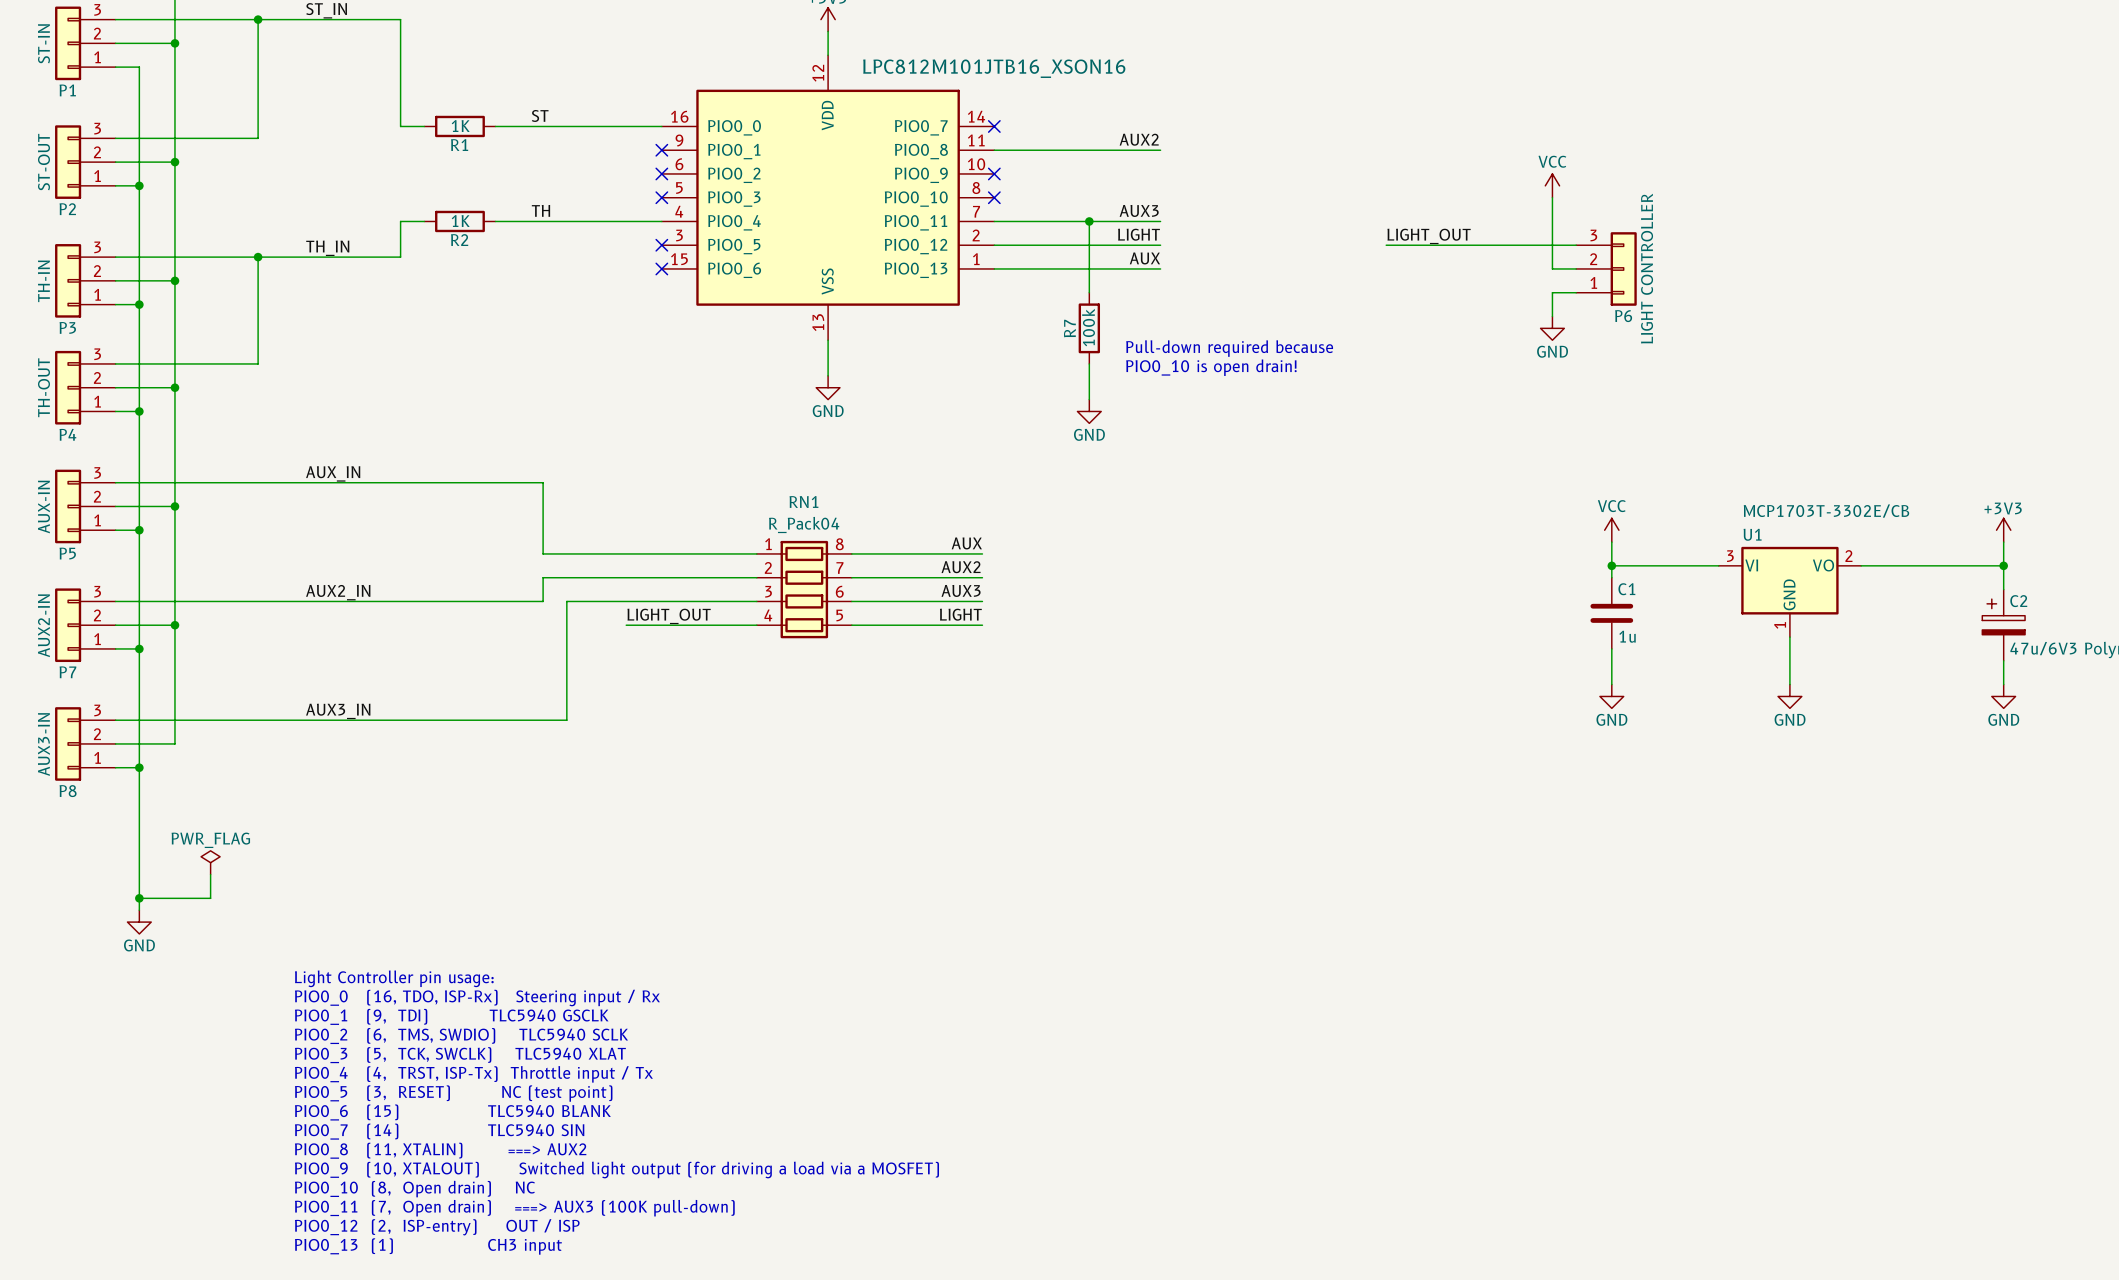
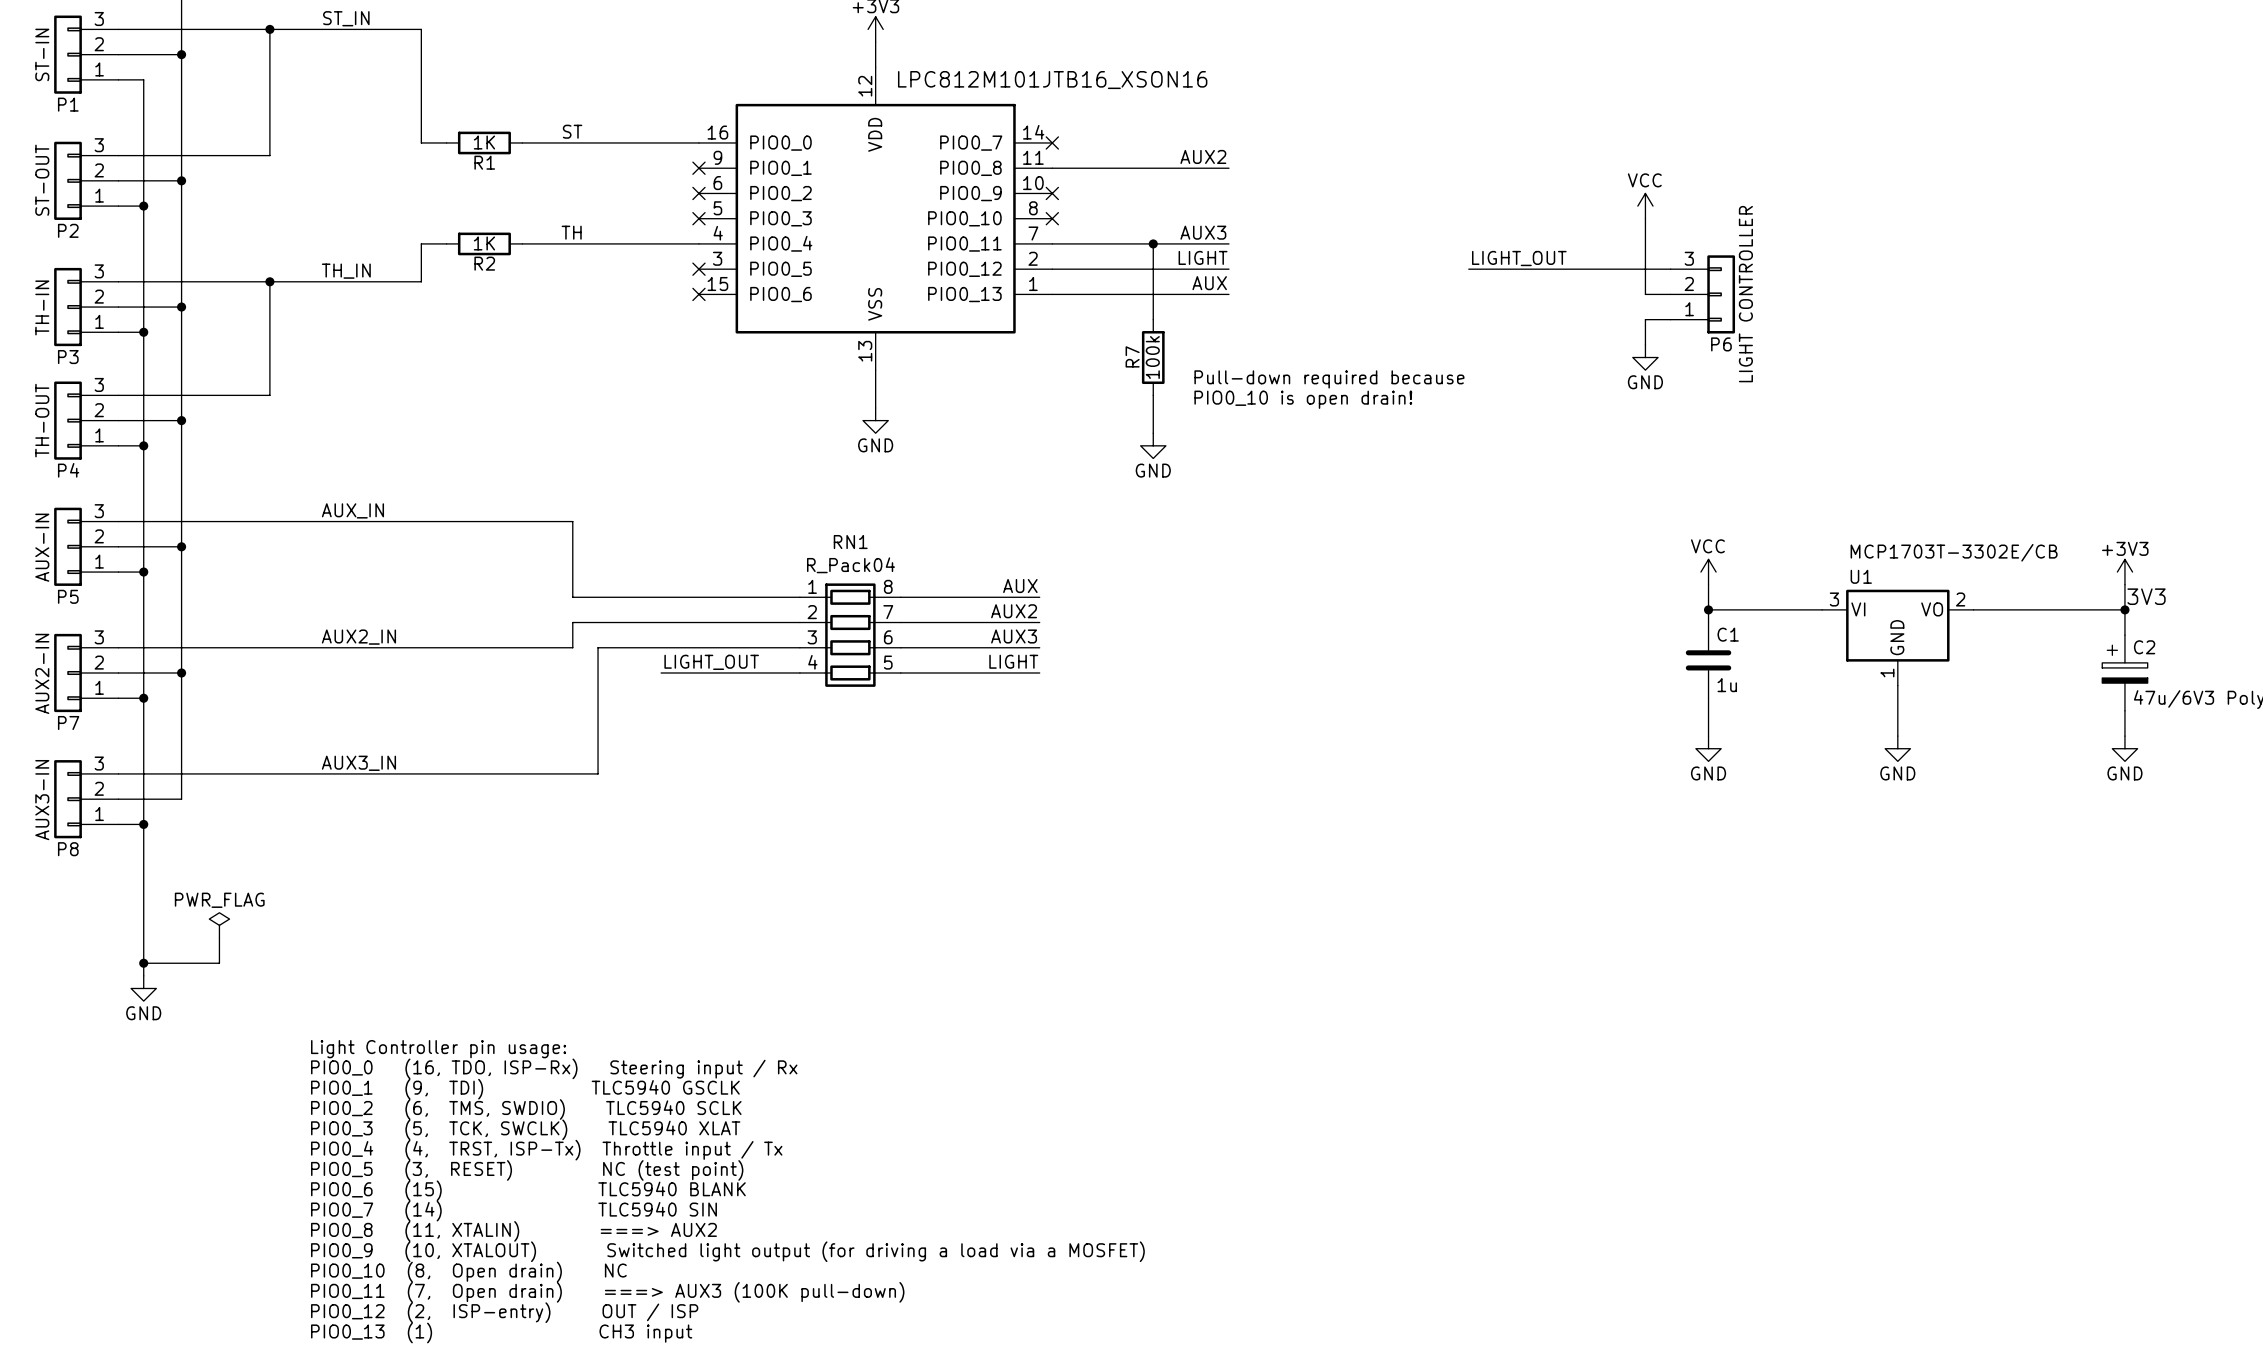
label: none -> 3V3 (2146, 596)

